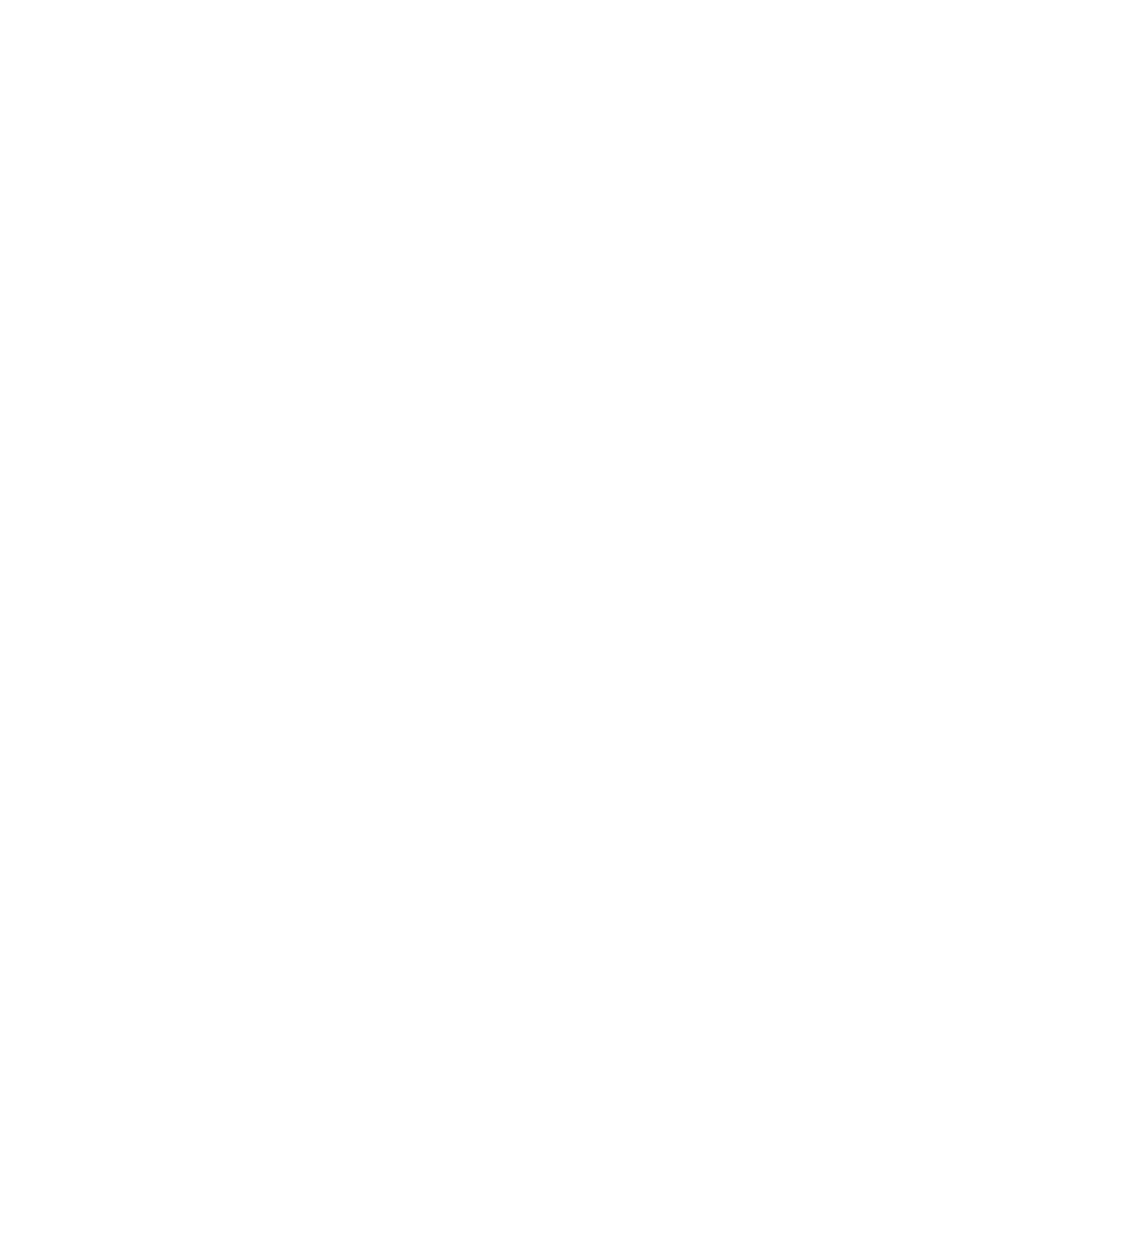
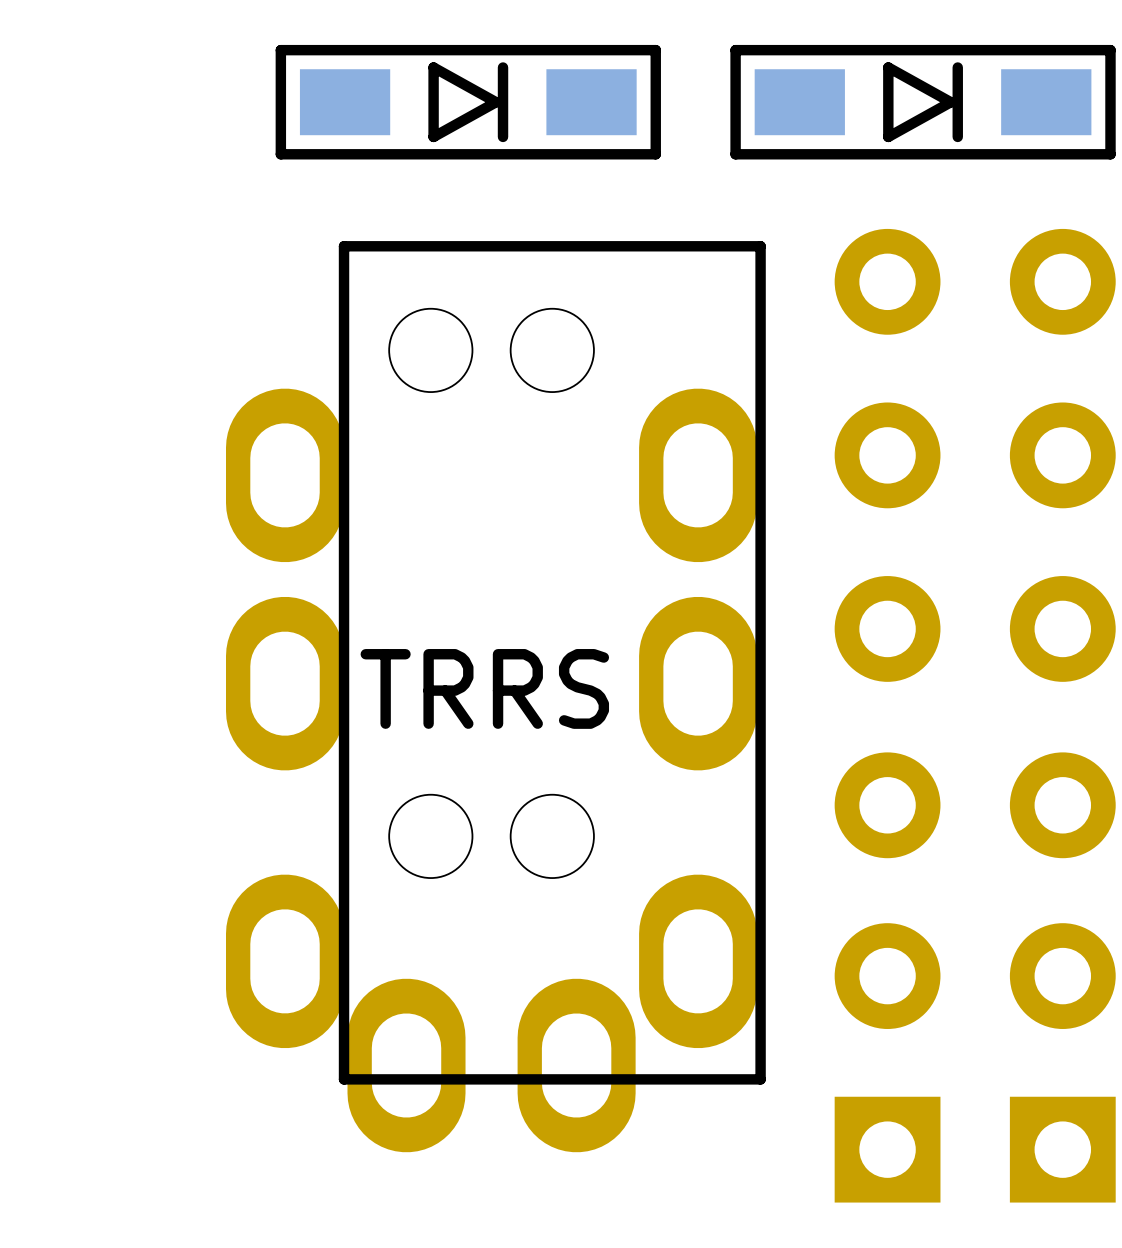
part: none -> (468, 102)
part: none -> (923, 102)
part: none -> (495, 696)
part: none -> (887, 715)
part: none -> (1062, 715)

